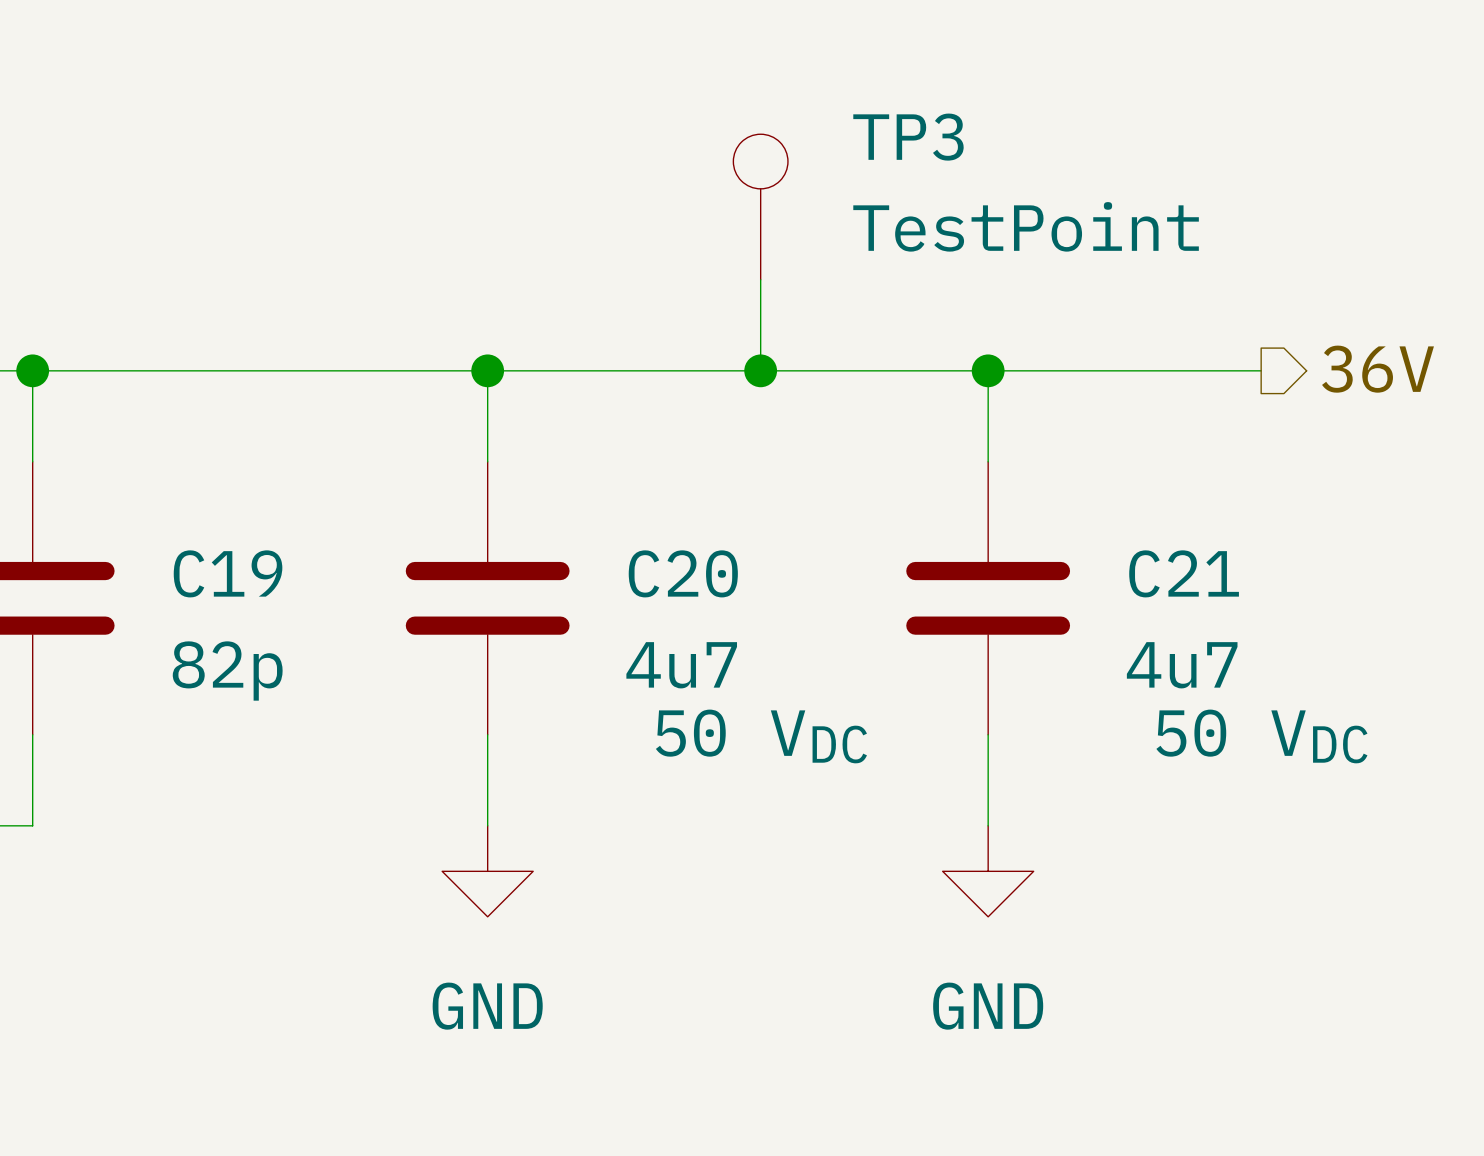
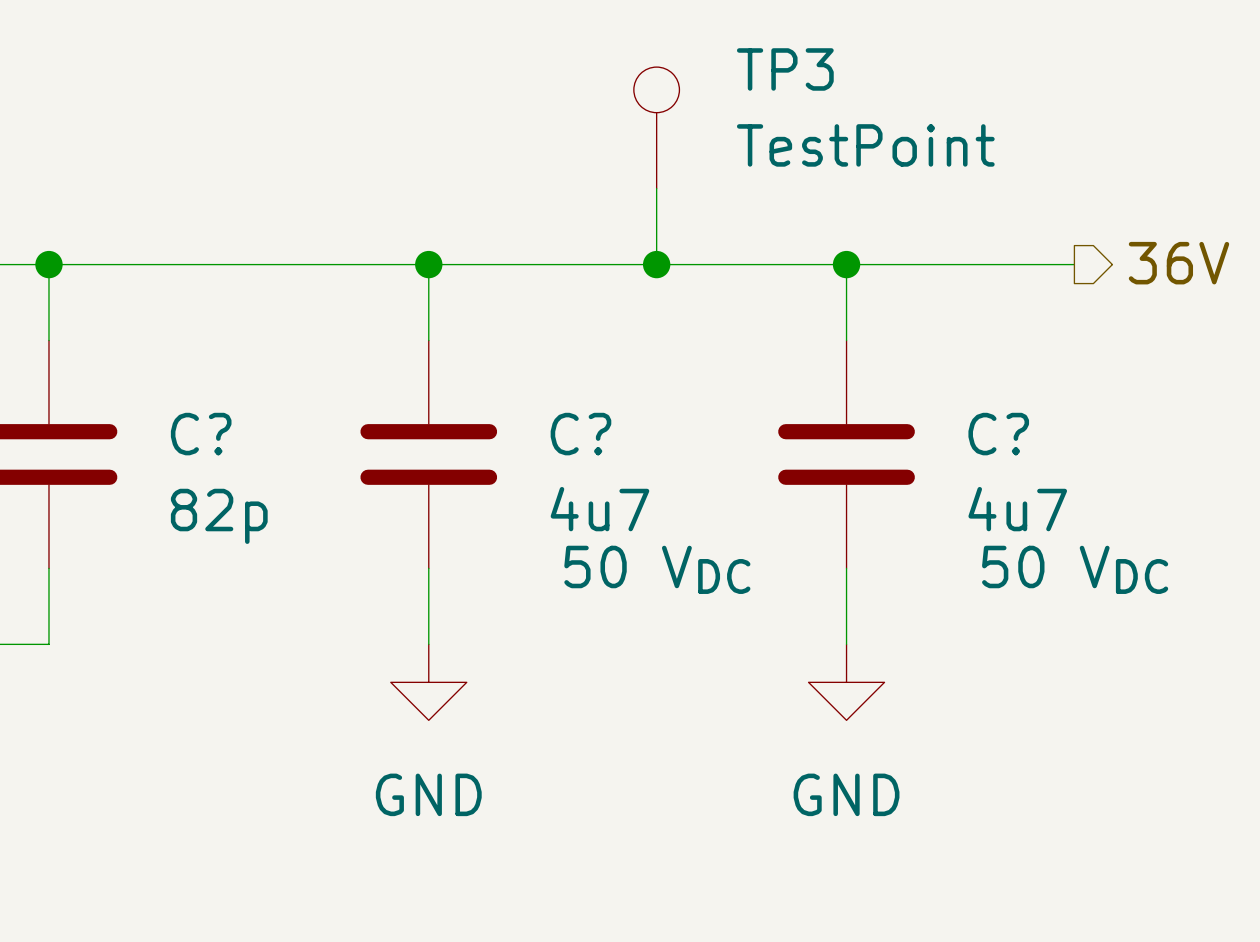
C19 name: C19 (228, 573) -> C? (201, 434)
C20 name: C20 (683, 573) -> C? (580, 434)
C21 name: C21 (1184, 573) -> C? (998, 434)

